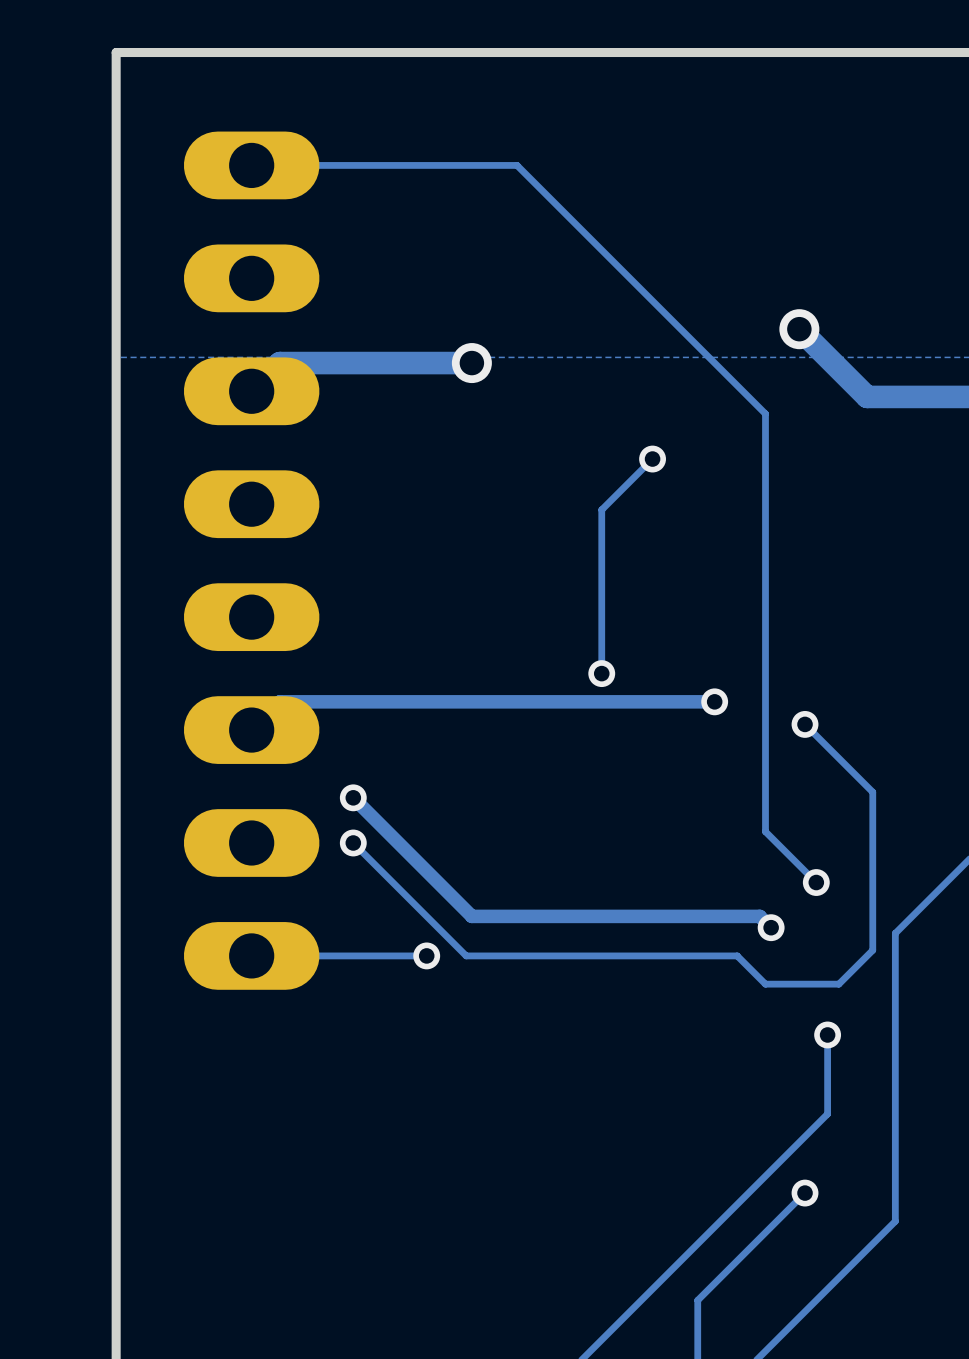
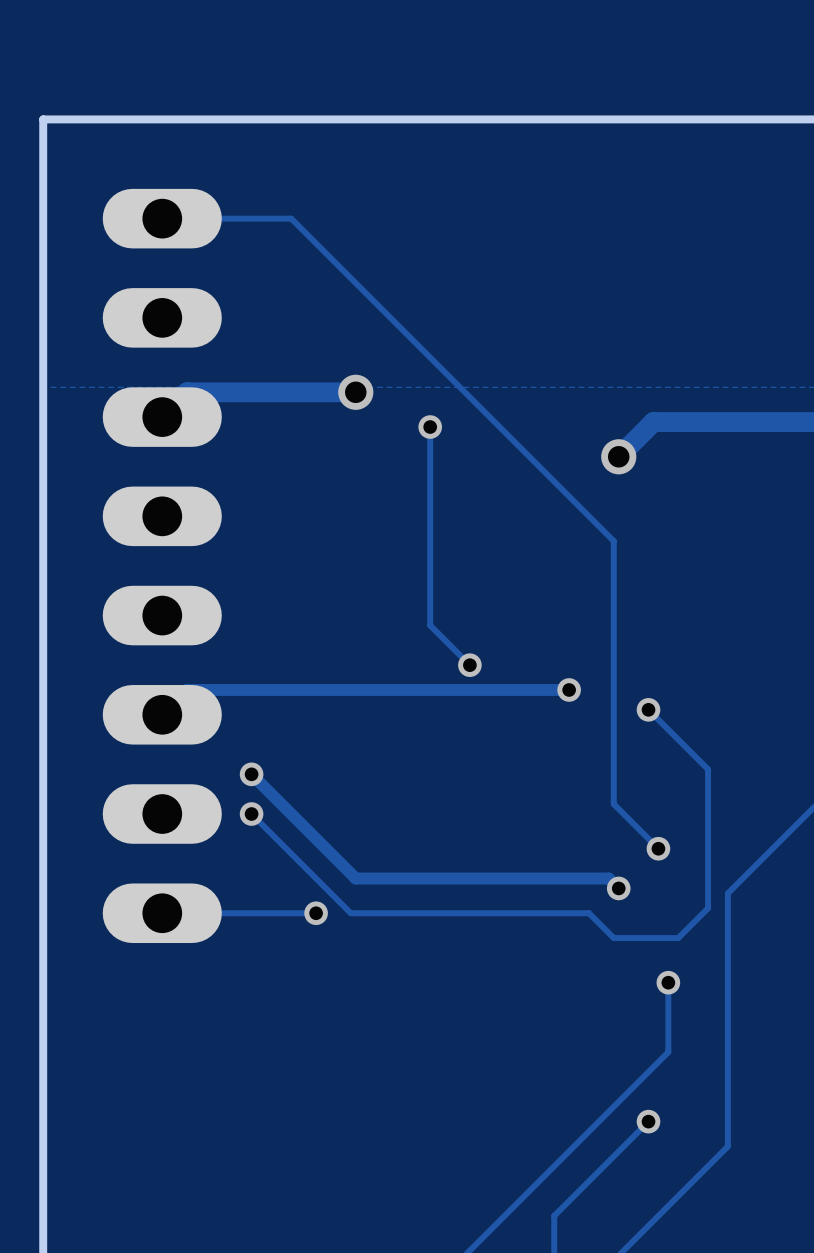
track: (398, 165) (517, 165) (765, 413) (765, 532) -> (291, 218) (613, 541)
track: (799, 329) (867, 396) -> (618, 456) (653, 422) (703, 422)
via position: (799, 329) -> (618, 456)
track: (652, 459) (601, 509) (601, 673) -> (430, 427) (430, 625) (469, 665)
via position: (652, 459) -> (430, 427)

